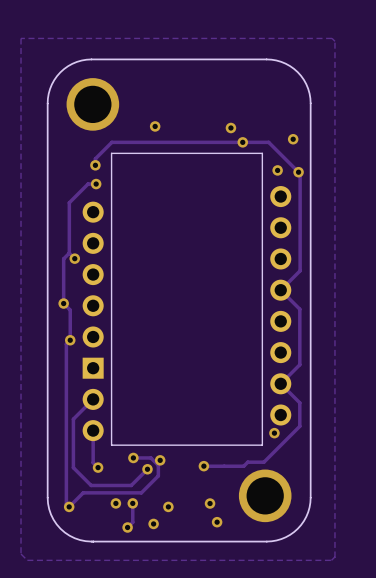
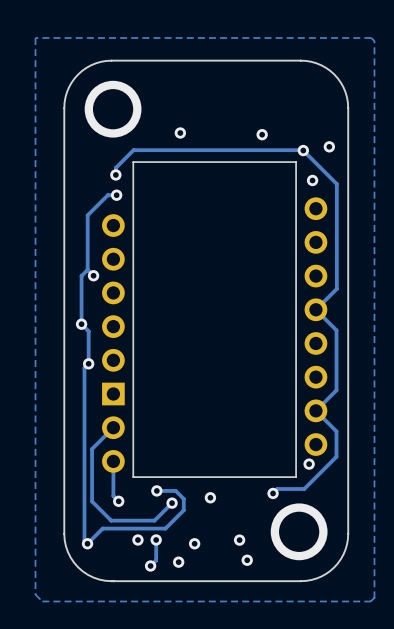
via: (242, 142) -> none
via: none -> (303, 150)
via: (298, 172) -> none
track: (269, 456) (263, 462) (247, 462) (243, 466) (203, 466) -> (304, 489) (277, 489) (273, 493)
via: (160, 460) -> none
via: none -> (273, 493)
via: none -> (210, 497)
via: (203, 466) -> none

